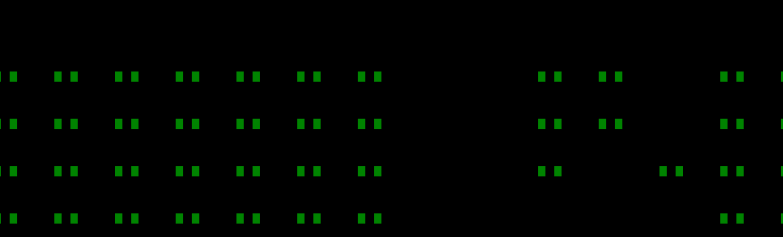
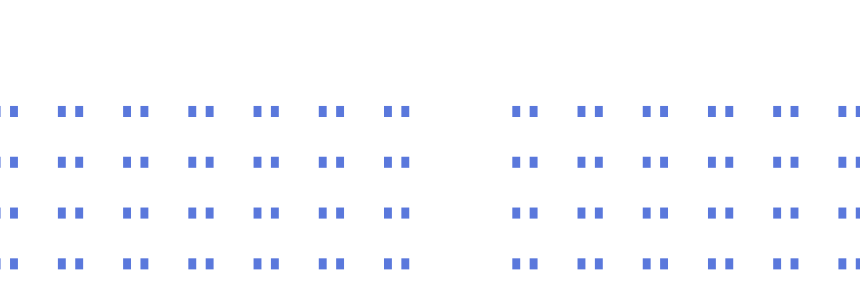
part: none -> (524, 111)
part: none -> (720, 111)
part: none -> (524, 162)
part: none -> (720, 162)
part: none -> (524, 213)
part: none -> (655, 213)
part: none -> (524, 263)
part: none -> (590, 263)
part: none -> (655, 263)
part: none -> (720, 263)

